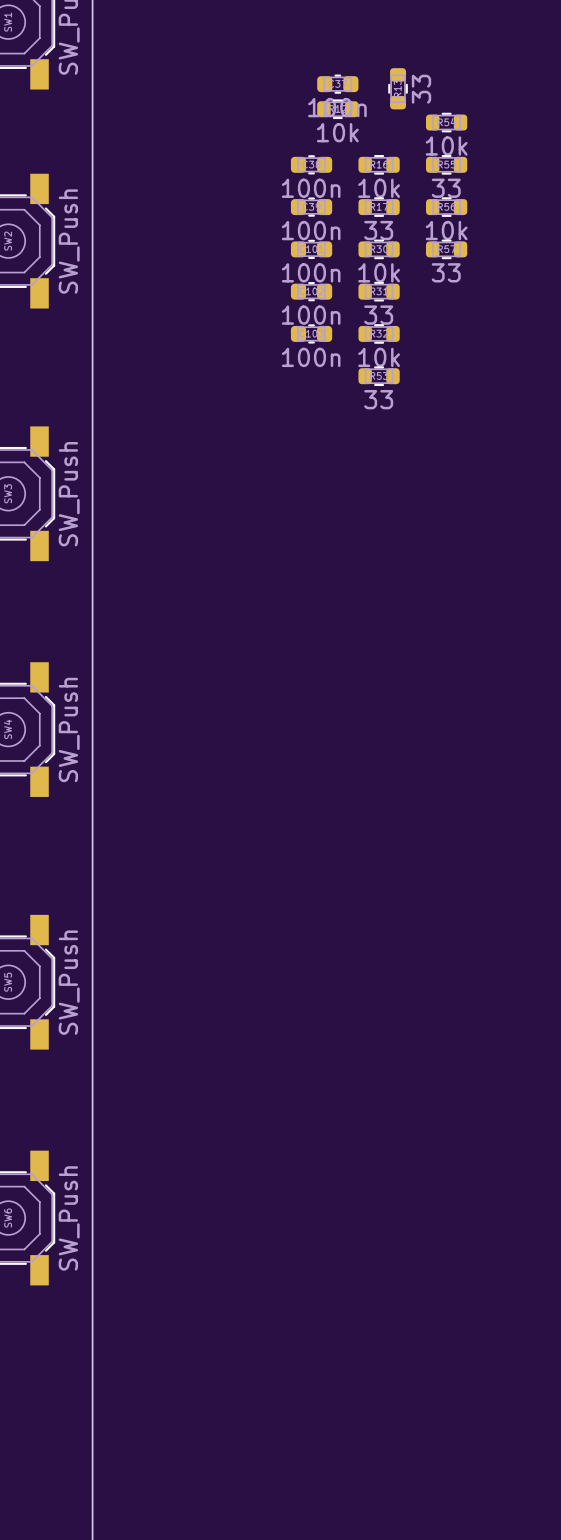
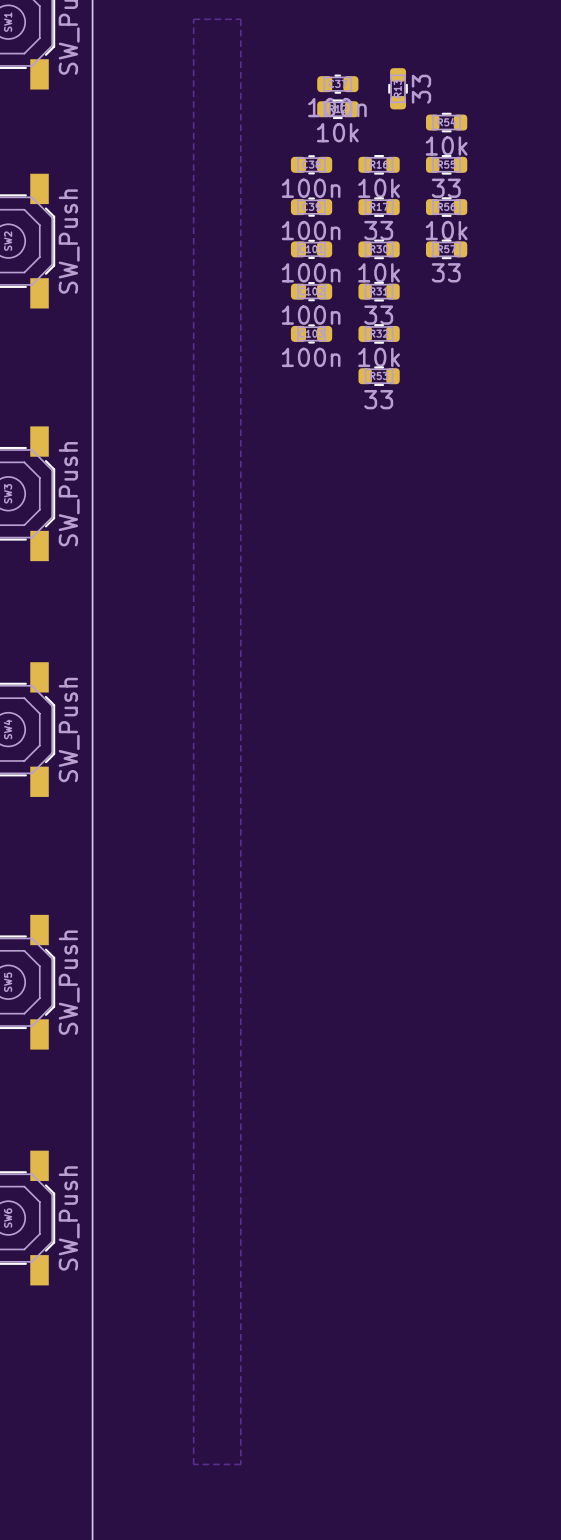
zone outline: none -> (193, 19) (240, 19) (240, 1464) (193, 1464) (193, 19)

